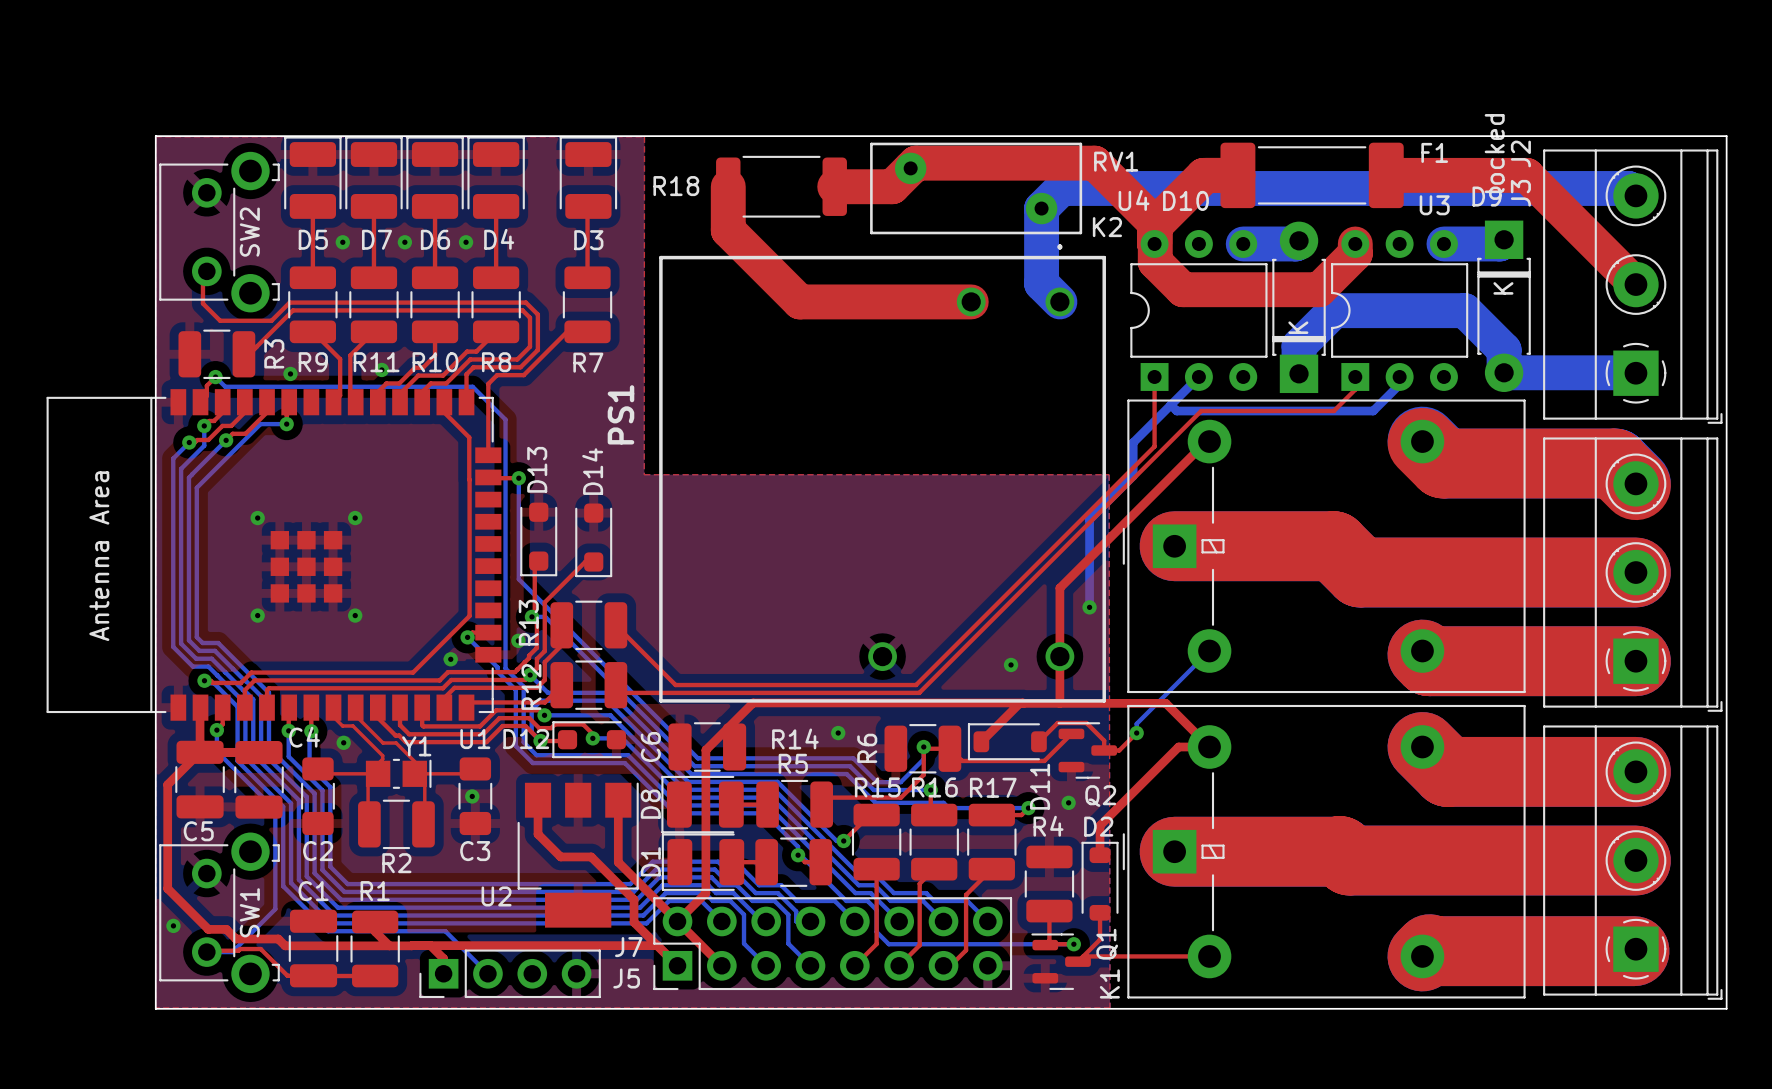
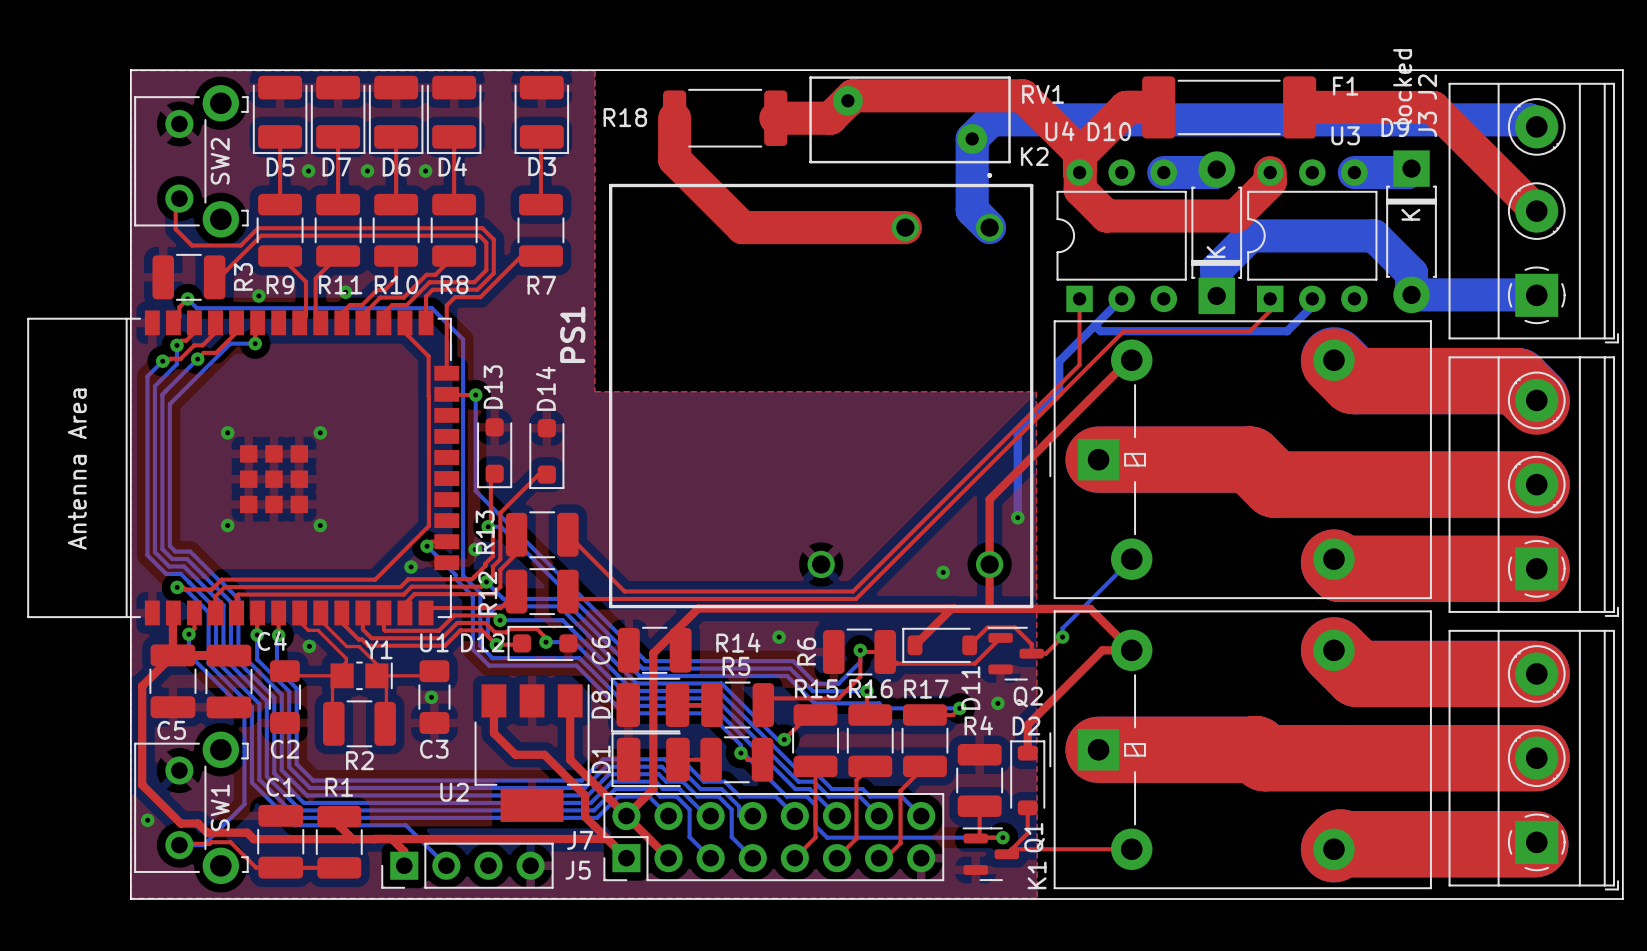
D5 rotation: 0° (312, 177) -> 180° (280, 114)
D7 rotation: 0° (373, 177) -> 180° (338, 114)
D6 rotation: 0° (435, 177) -> 180° (396, 114)
D4 rotation: 0° (496, 177) -> 180° (454, 114)
D3 rotation: 0° (588, 177) -> 180° (541, 114)

